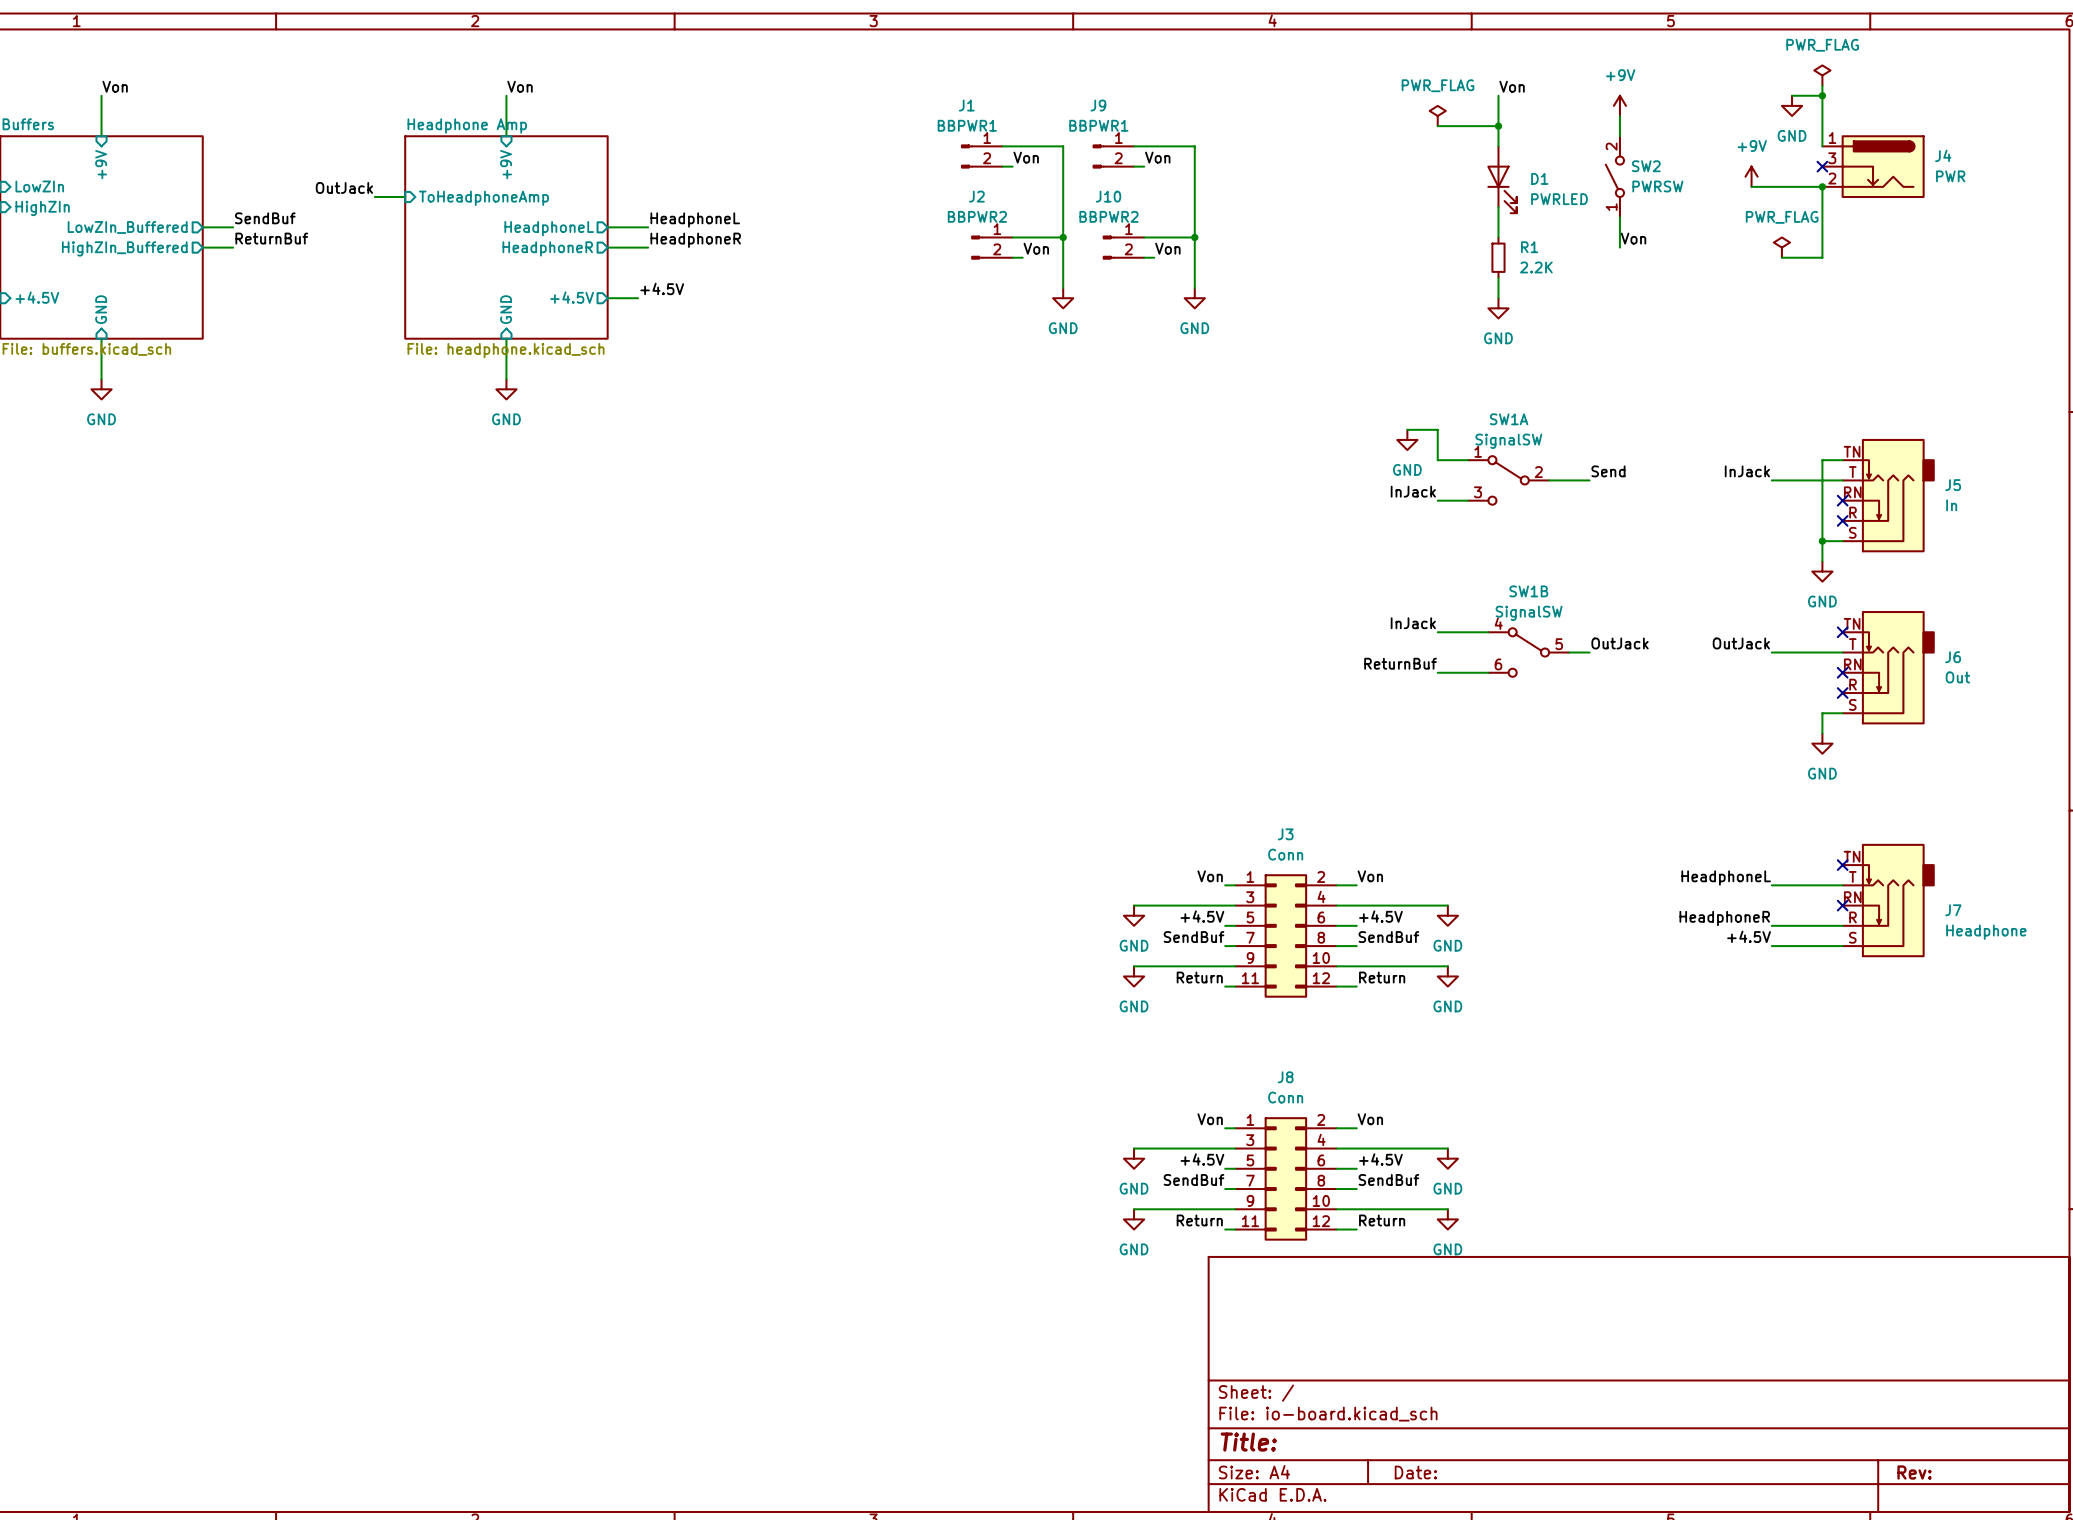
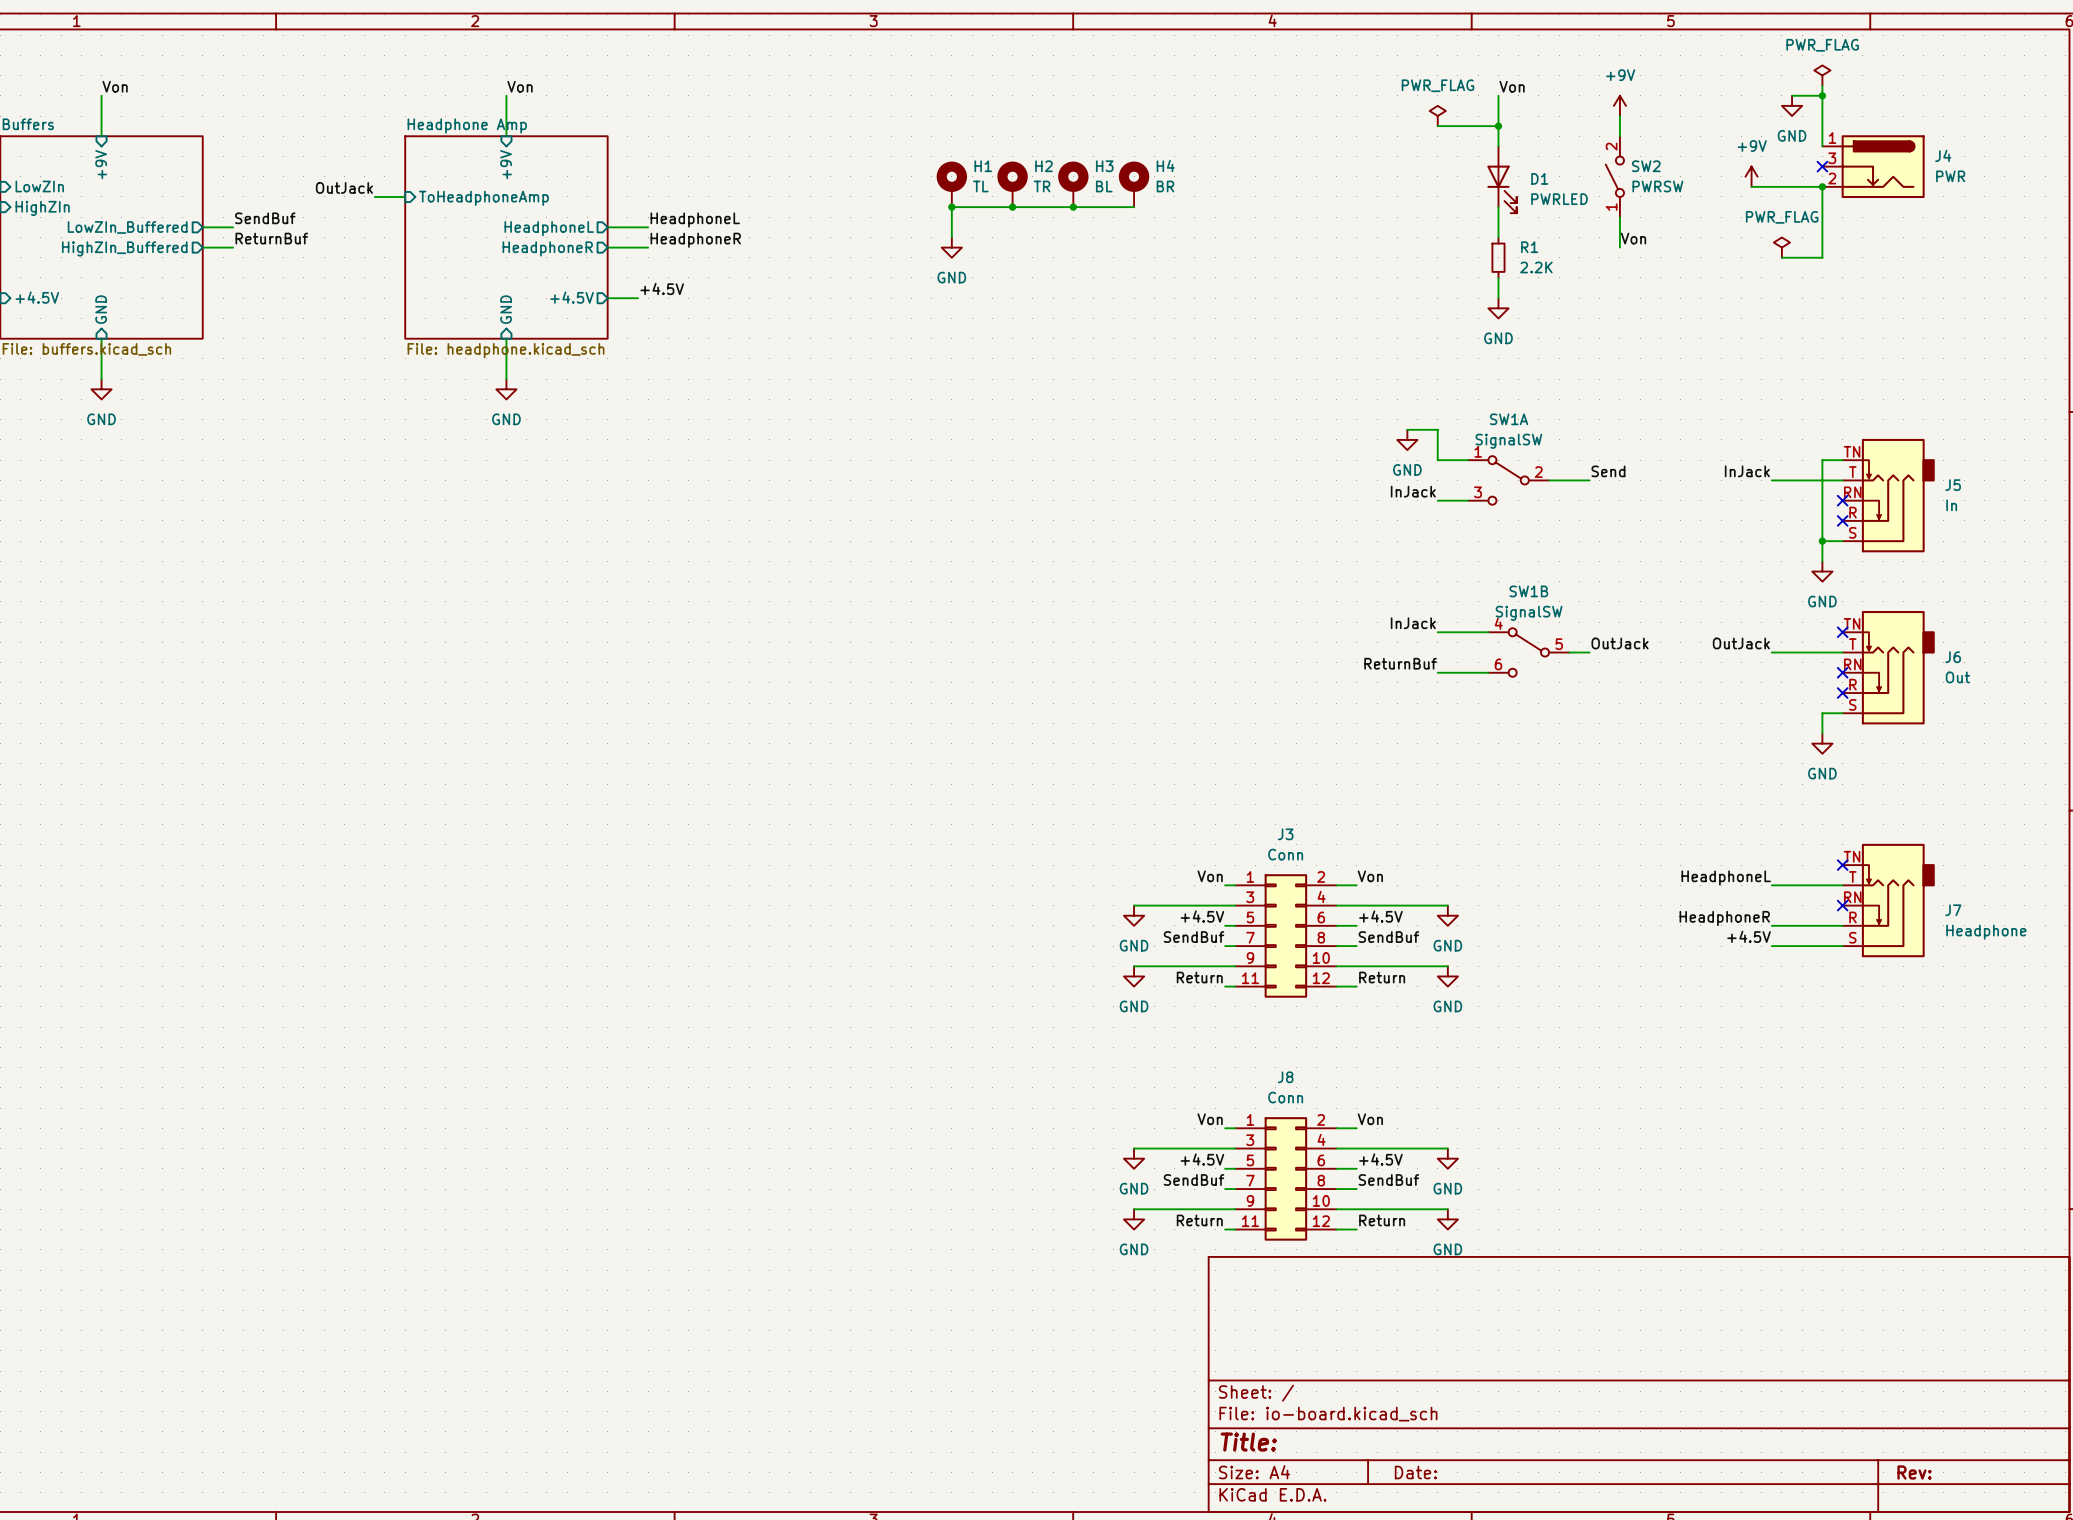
wire: (1002, 146) (1063, 146) (1063, 288) -> none
wire: (1134, 146) (1194, 146) (1194, 288) -> none
J1: BBPWR1 (981, 156) -> none
J9: BBPWR1 (1113, 156) -> none
label: Von (1026, 157) -> none
label: Von (1157, 157) -> none
H1: none -> TL (951, 184)
H2: none -> TR (1012, 184)
H3: none -> BL (1073, 184)
H4: none -> BR (1134, 184)
junction: none -> (951, 207)
junction: none -> (1012, 207)
junction: none -> (1073, 207)
wire: none -> (1134, 207) (951, 207) (951, 237)
wire: (1012, 237) (1063, 237) -> none
junction: (1063, 237) -> none
wire: (1144, 237) (1194, 237) -> none
junction: (1194, 237) -> none
J2: BBPWR2 (992, 247) -> none
J10: BBPWR2 (1123, 247) -> none
label: Von (1036, 248) -> none
label: Von (1167, 248) -> none
wire: (1012, 257) (1022, 257) -> none
wire: (1144, 257) (1154, 257) -> none
power symbol position: GND (1063, 298) -> GND (951, 247)
power symbol: GND (1194, 298) -> none

